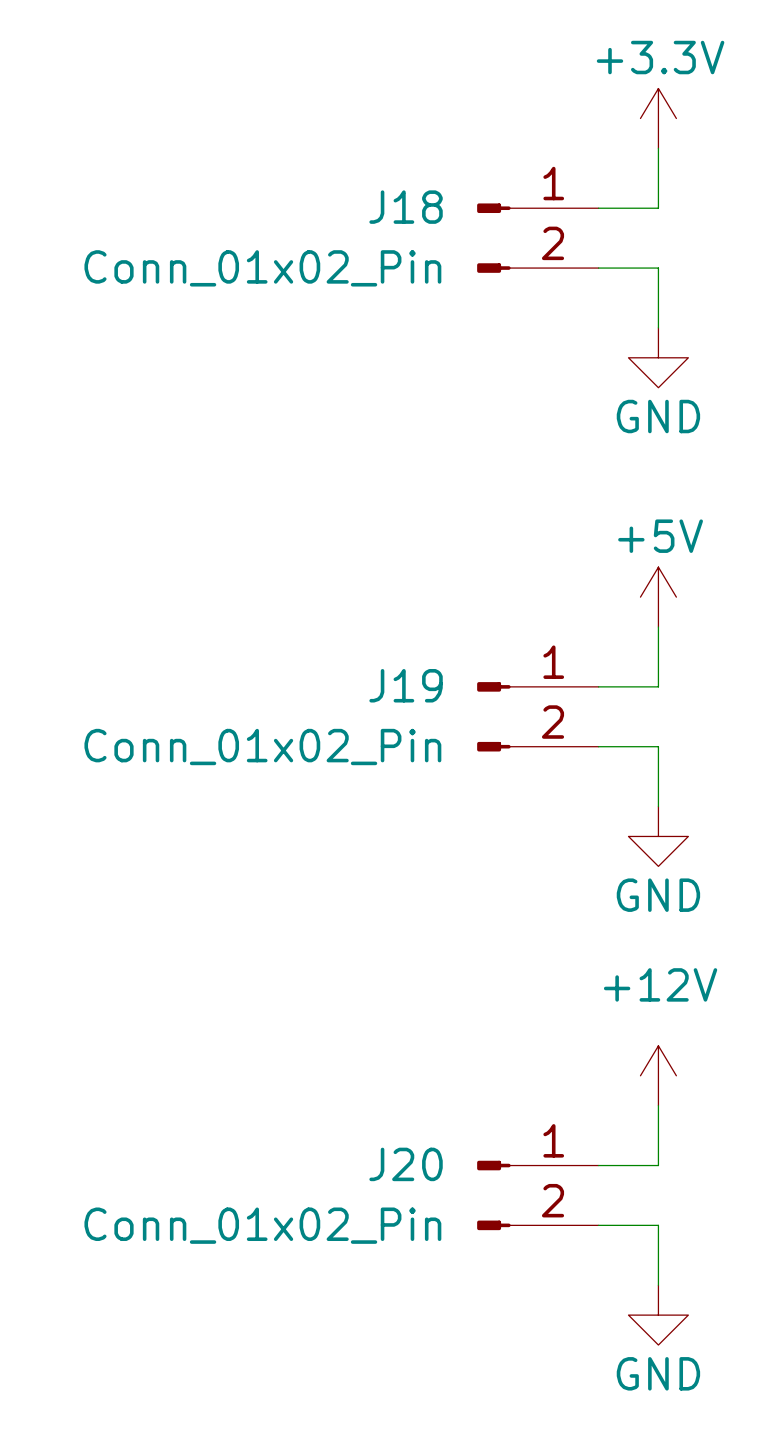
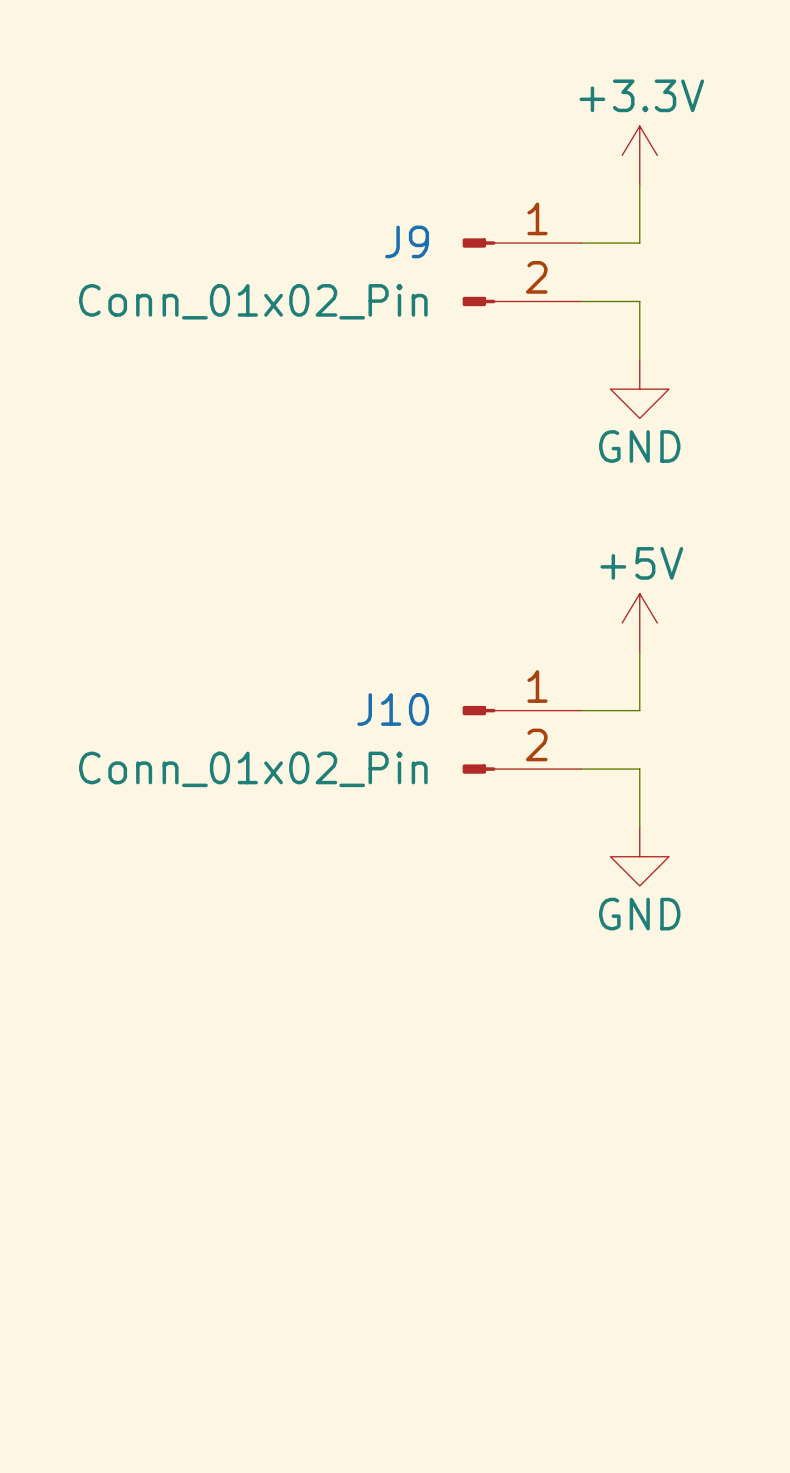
J18 name: J18 (406, 207) -> J9 (407, 241)
J19 name: J19 (406, 685) -> J10 (393, 709)
power symbol: +12V (658, 1075) -> none
wire: (658, 1105) (658, 1165) (598, 1165) -> none
J20: Conn_01x02_Pin (537, 1195) -> none
wire: (598, 1225) (658, 1225) (658, 1285) -> none
power symbol: GND (658, 1315) -> none

